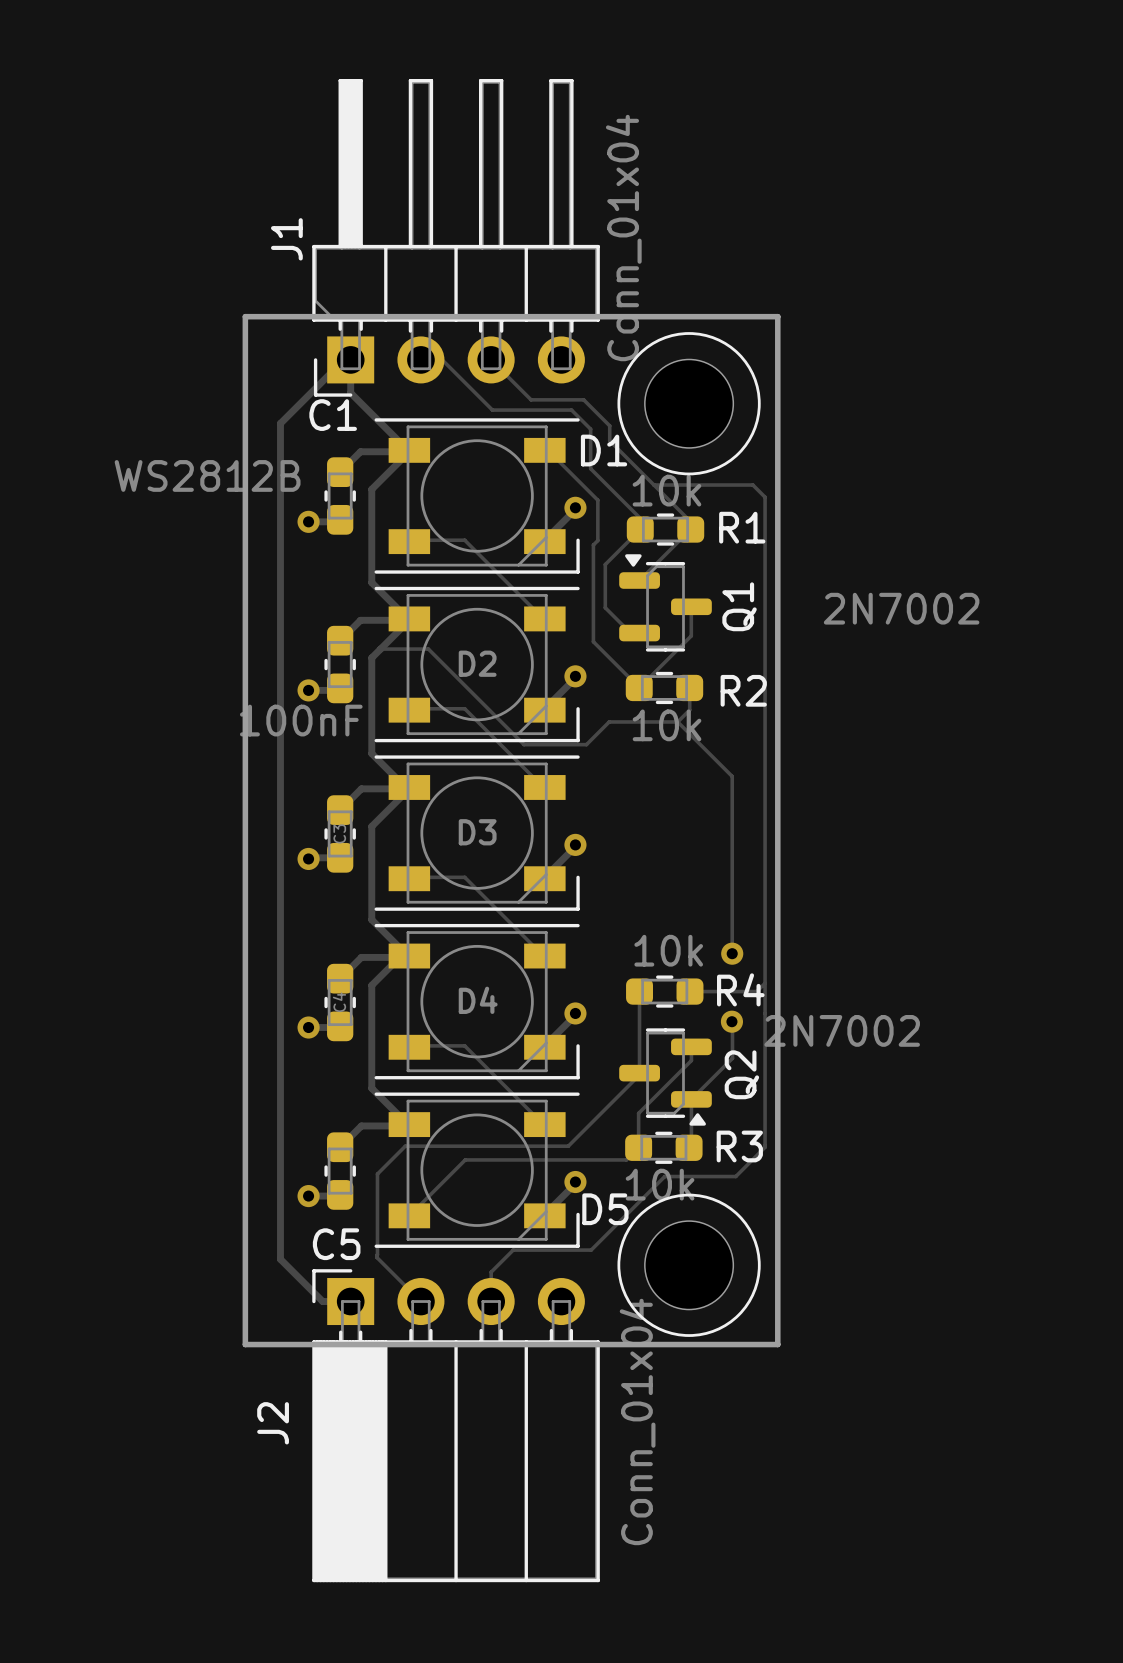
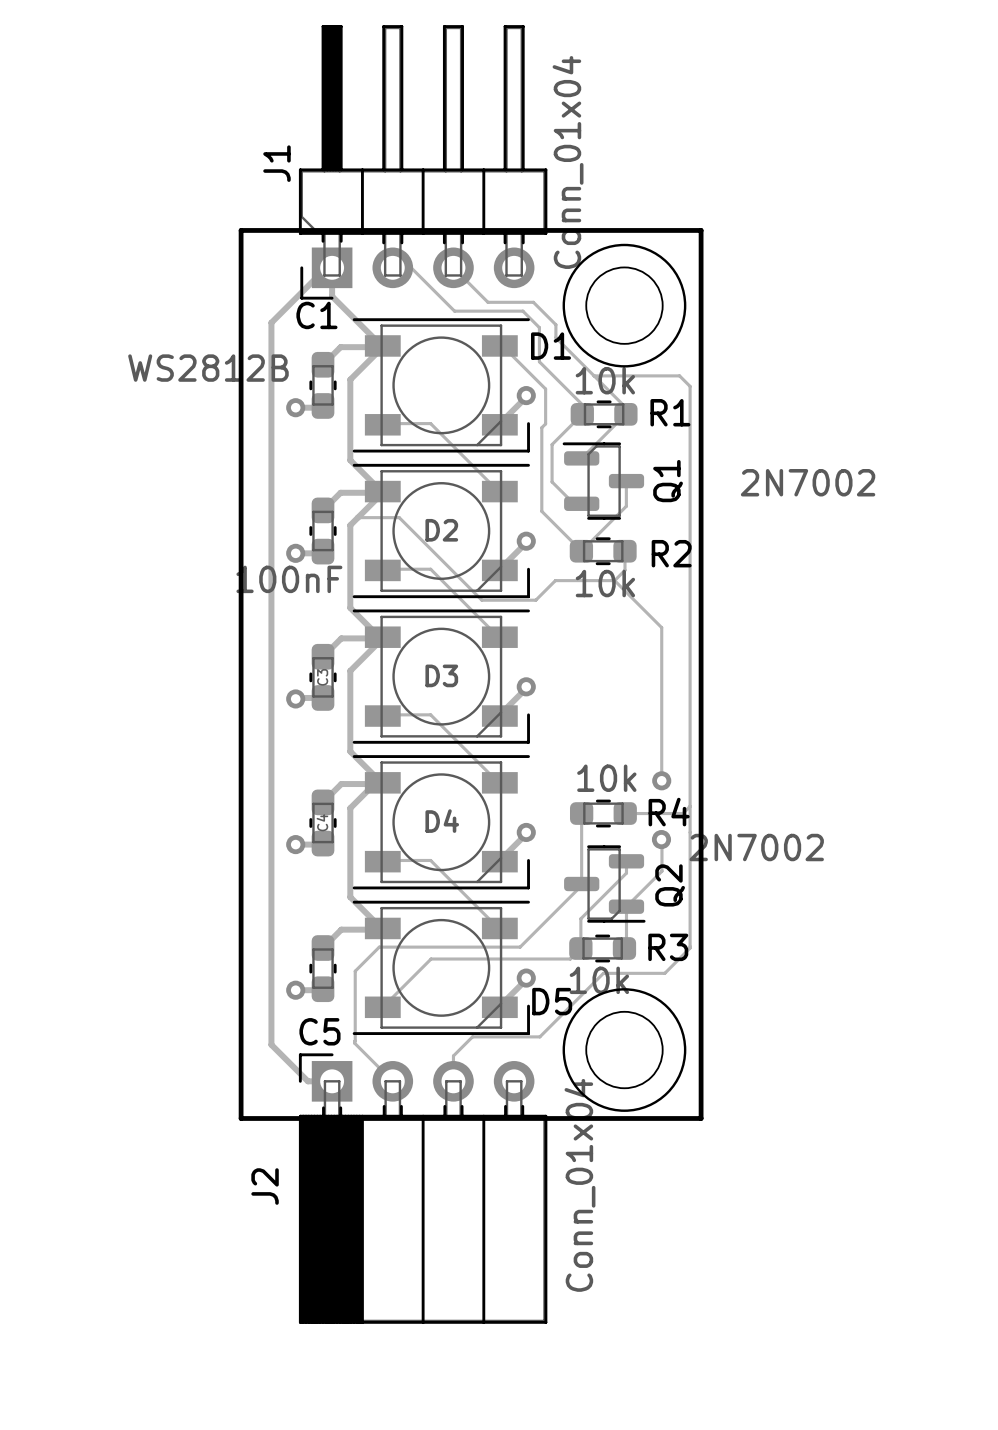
Q1 footprint: [619, 554, 712, 652] -> [562, 442, 645, 520]
Q2 footprint: [619, 1028, 712, 1126] -> [564, 845, 646, 923]

